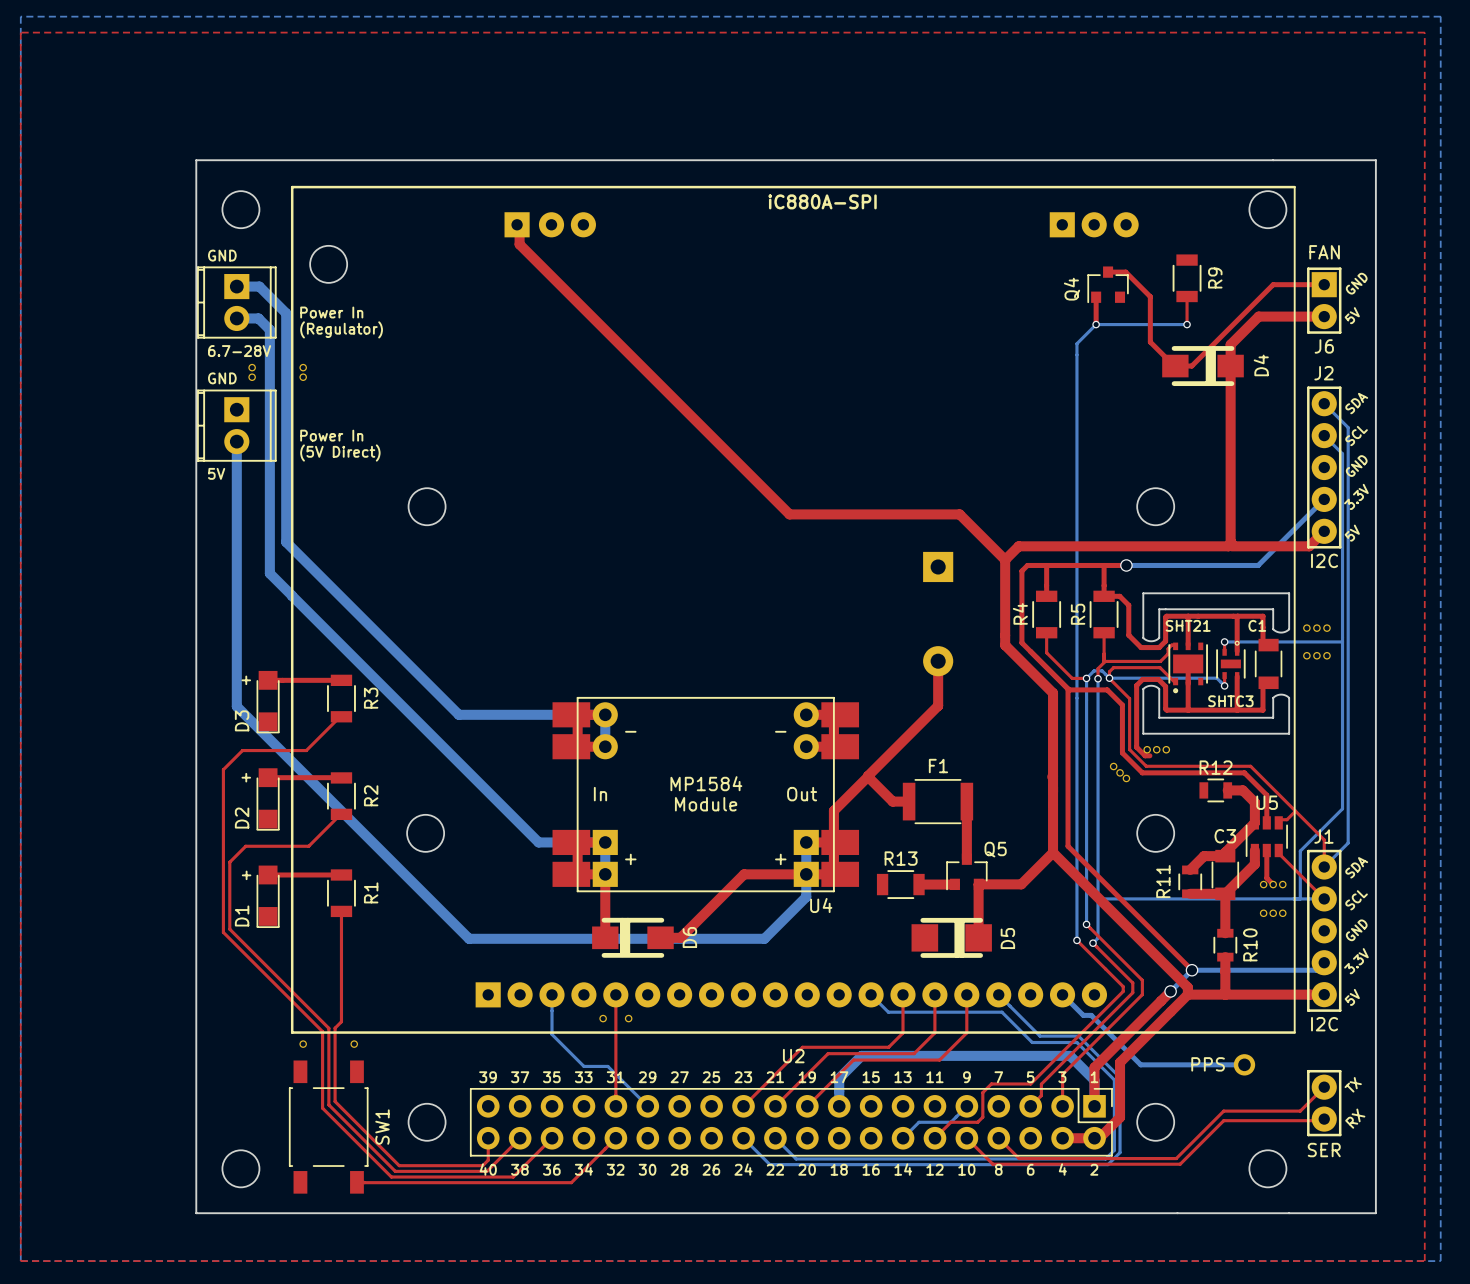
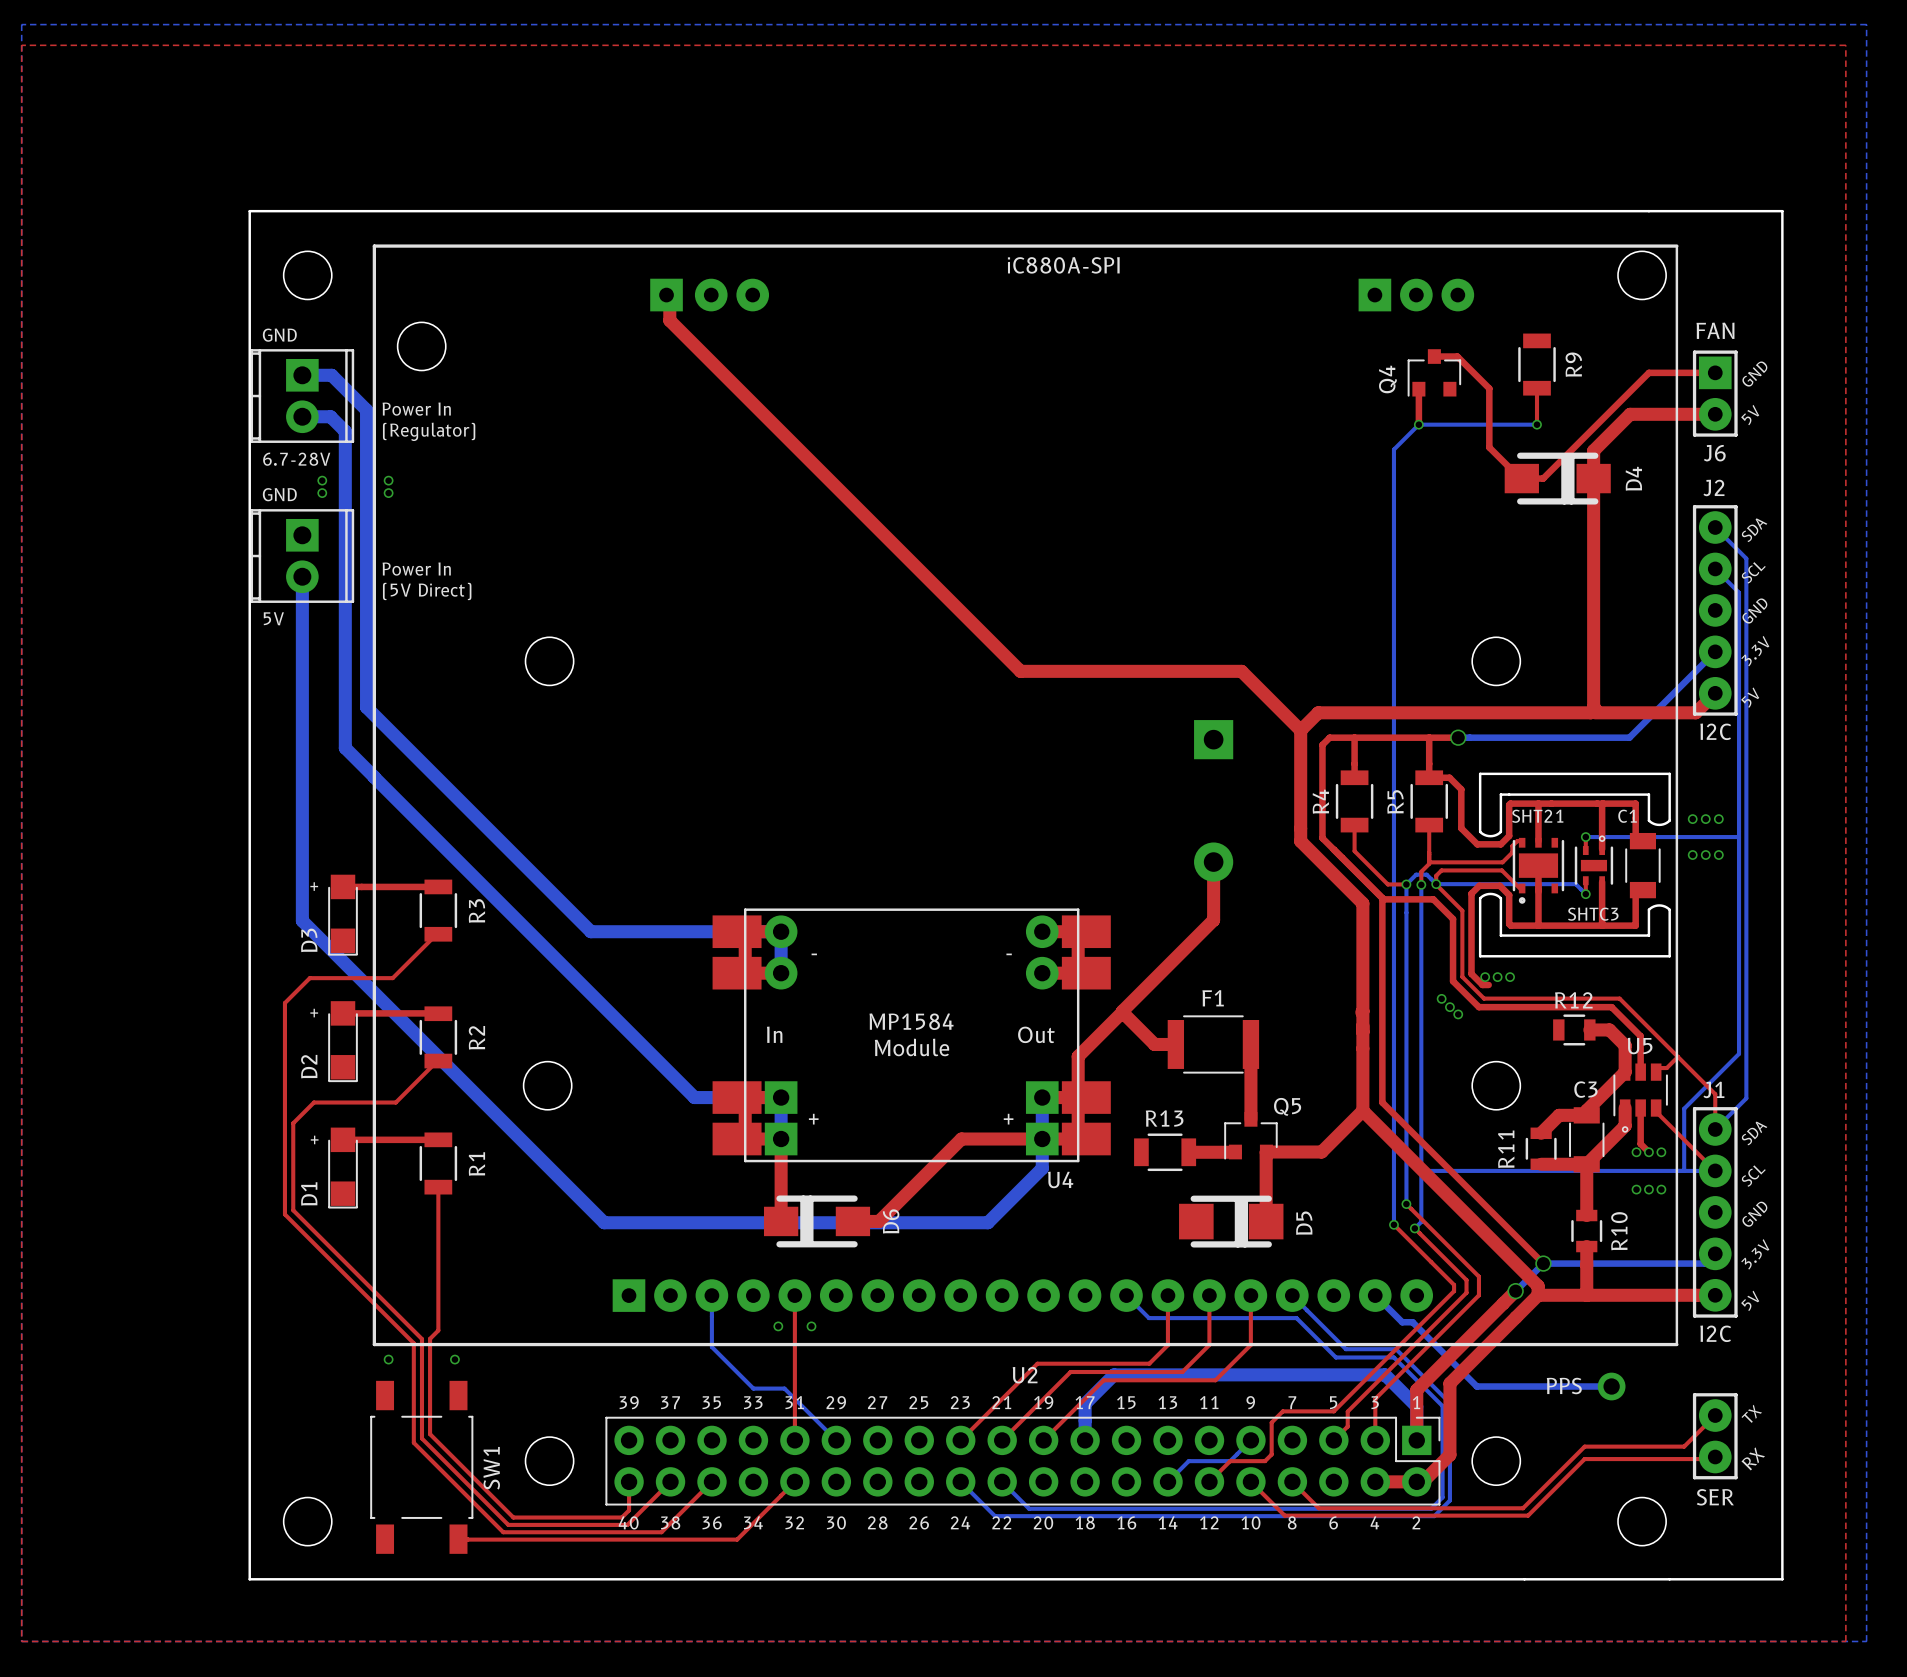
U5 footprint: [1245, 816, 1288, 858] -> [1613, 1063, 1668, 1133]

